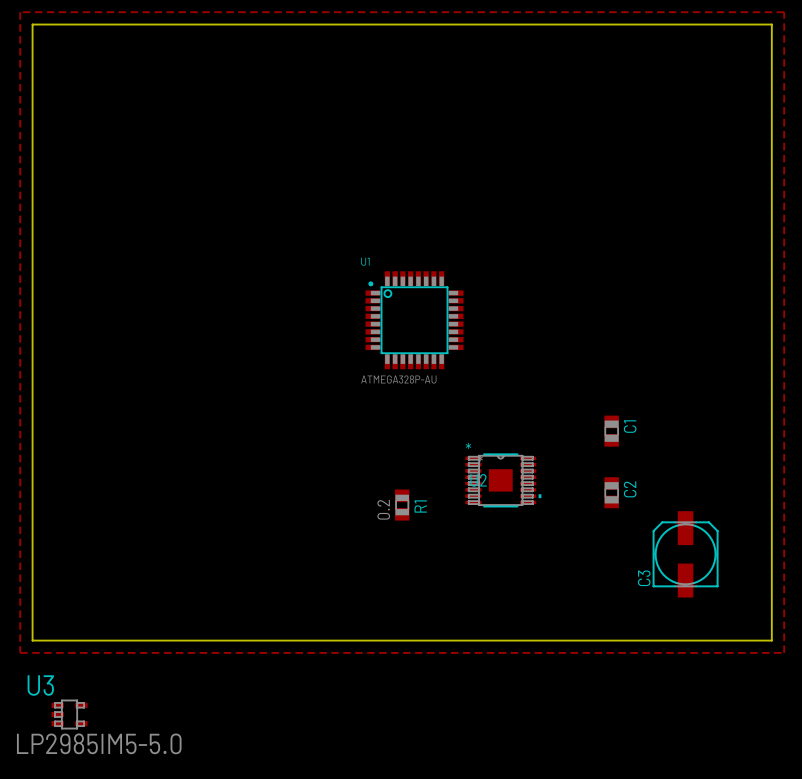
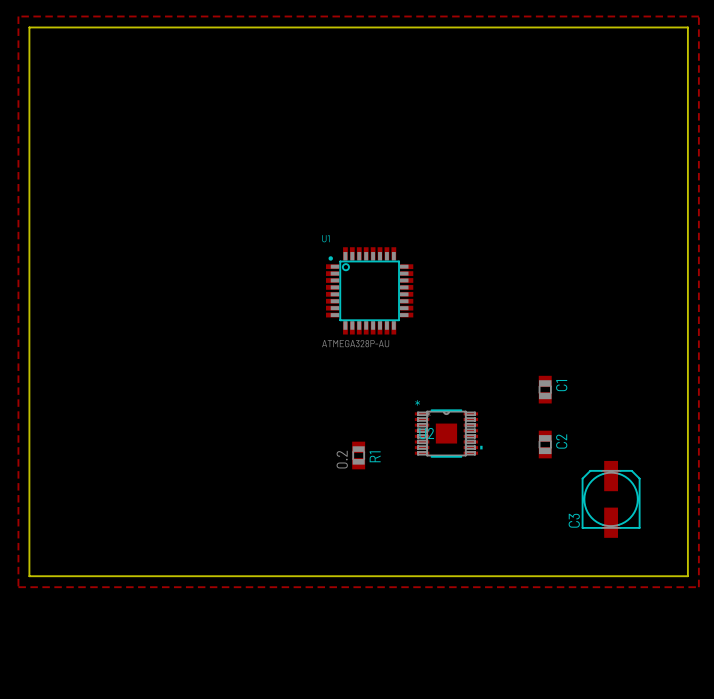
U3: LP2985IM5-5.0 (69, 714) -> none

